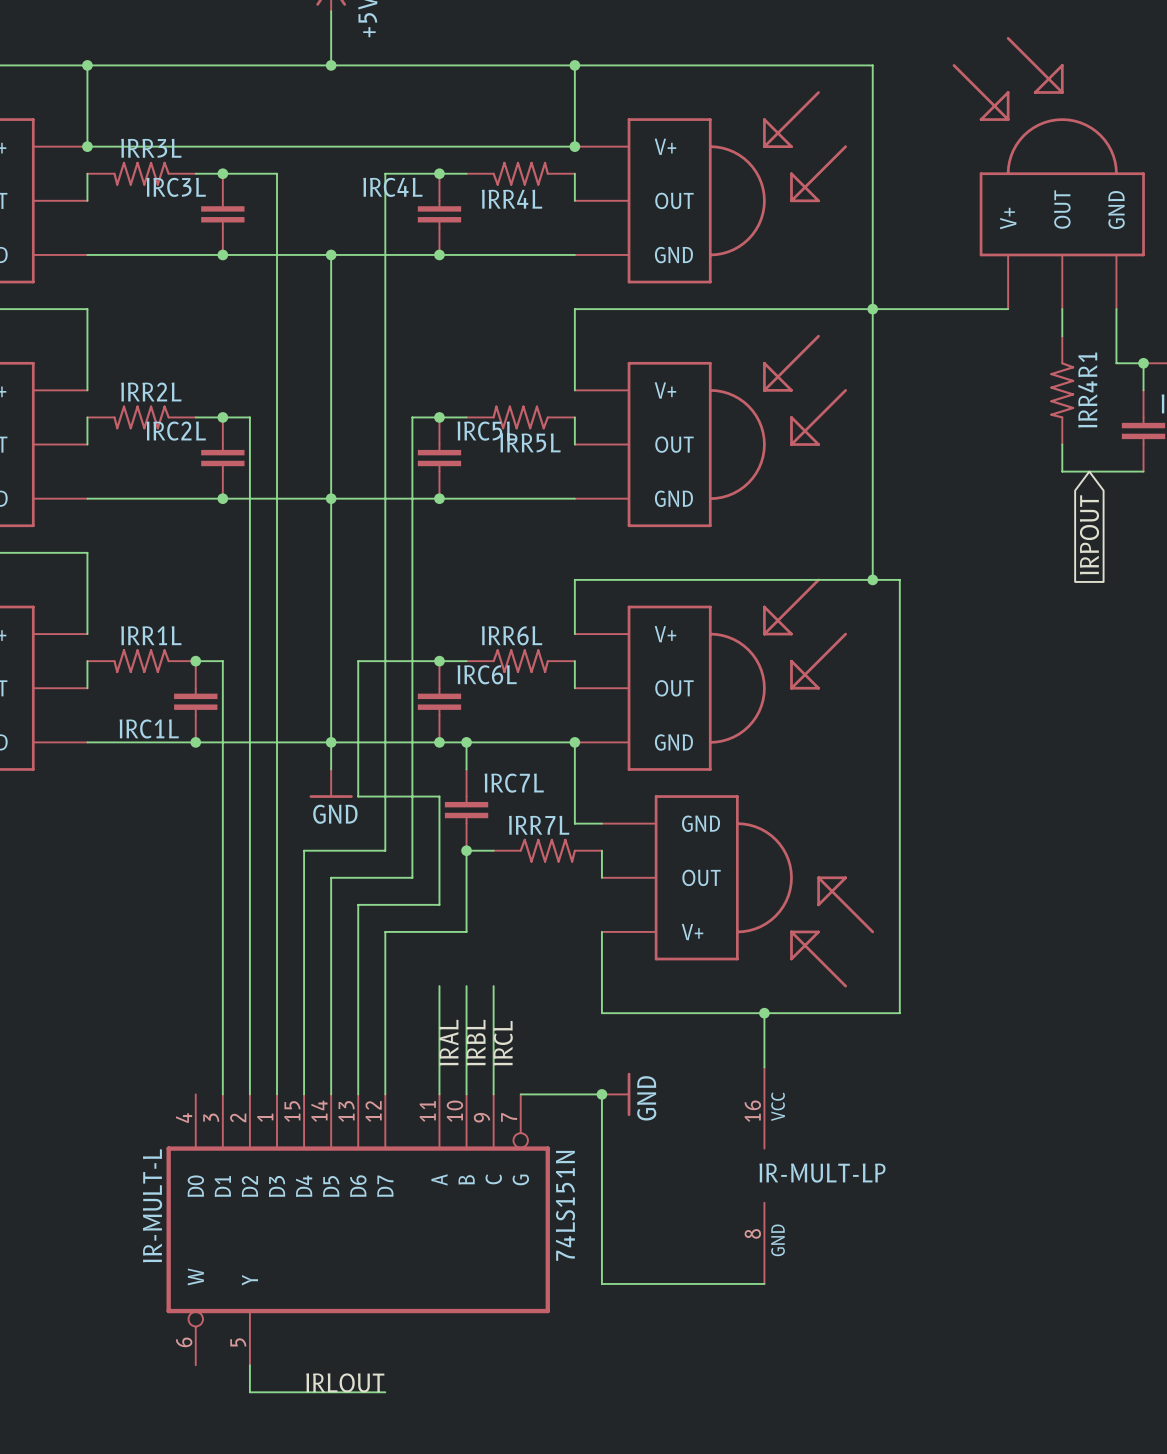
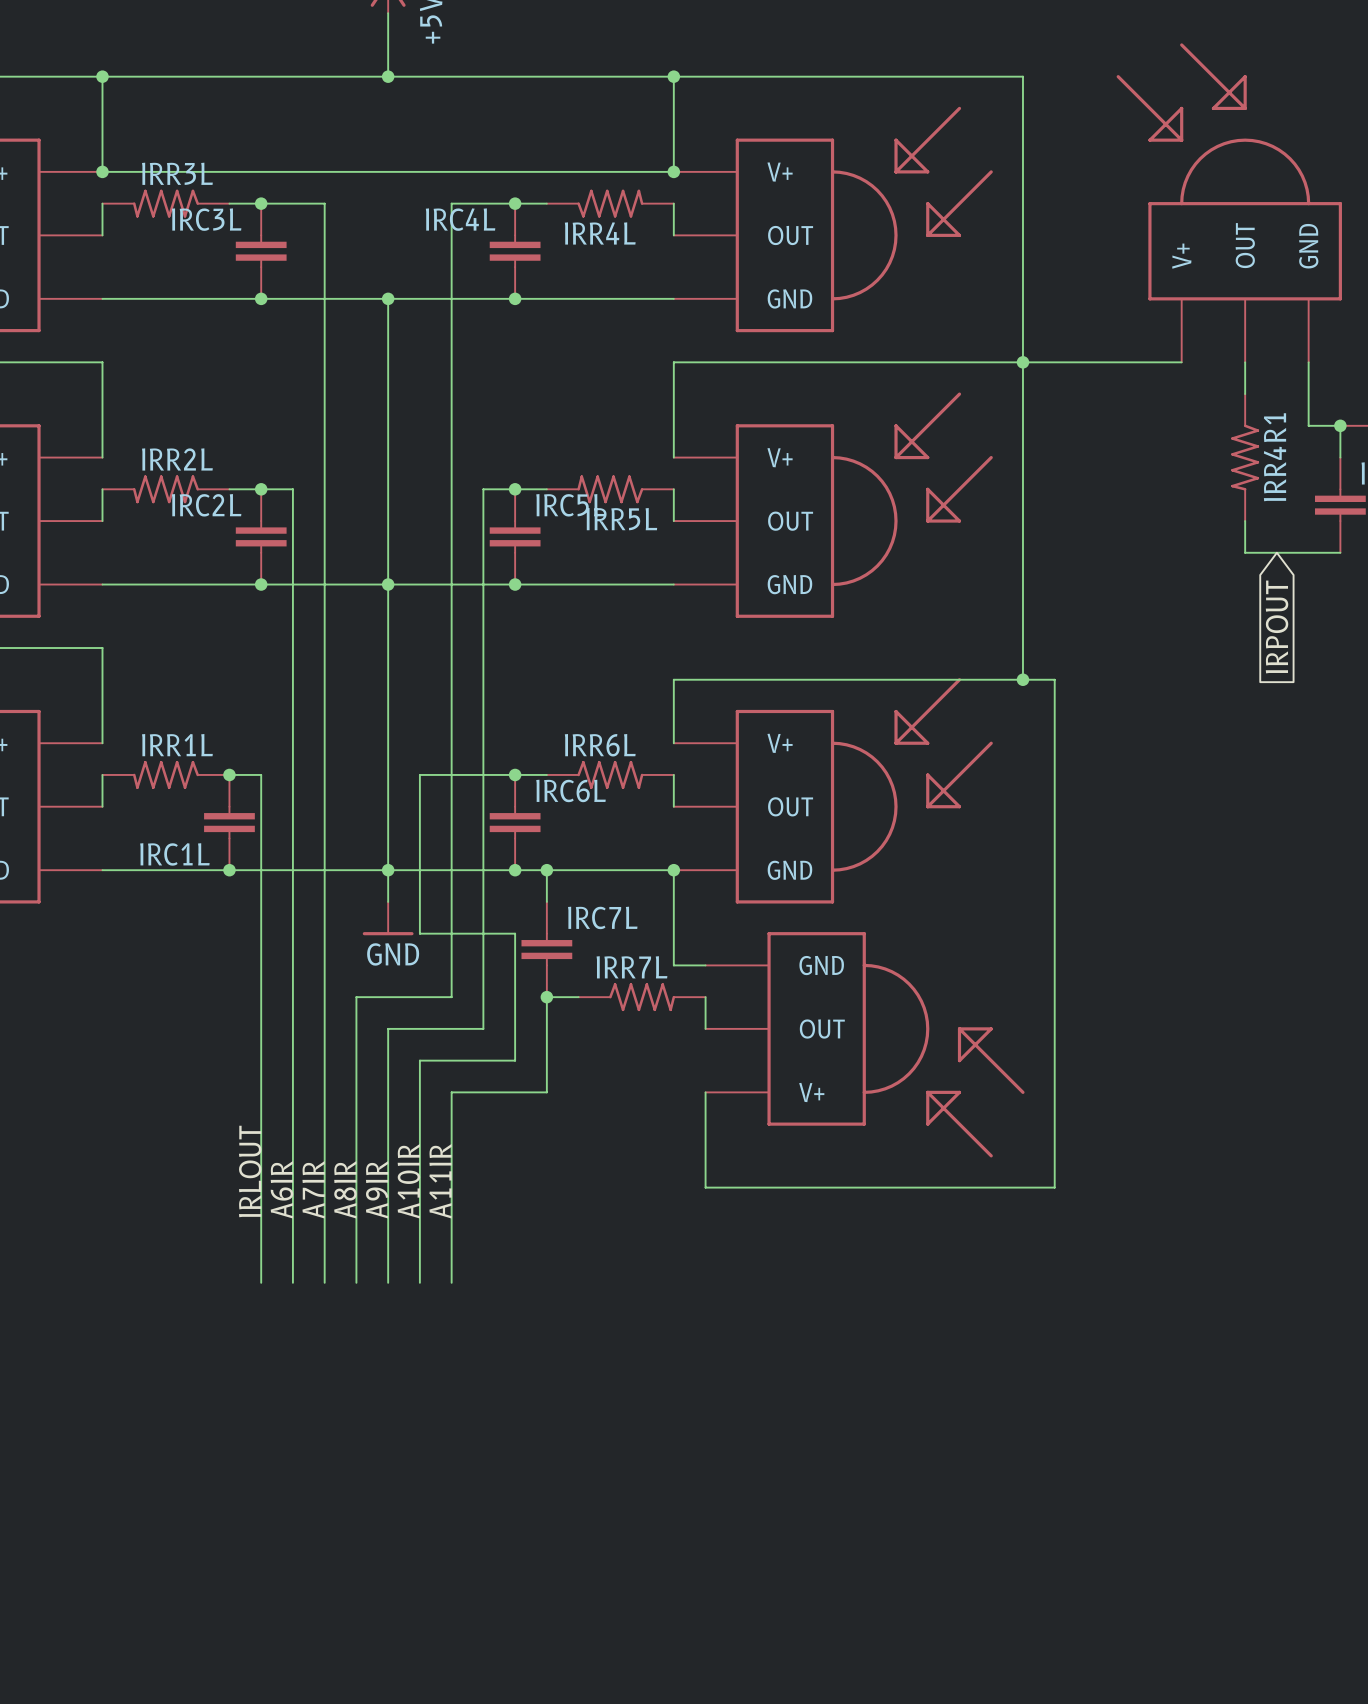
wire: (439, 986) (439, 1094) -> none
wire: (466, 986) (466, 1094) -> none
wire: (493, 986) (493, 1094) -> none
label: none -> IRLOUT (250, 1171)
label: none -> A10IR (408, 1181)
label: none -> A11IR (440, 1181)
wire: (764, 1013) (764, 1067) -> none
junction: (764, 1013) -> none
label: none -> A6IR (281, 1189)
label: none -> A7IR (313, 1189)
label: none -> A8IR (345, 1189)
label: none -> A9IR (377, 1189)
label: IRAL (448, 1042) -> none
label: IRBL (476, 1042) -> none
label: IRCL (503, 1043) -> none
wire: (520, 1094) (601, 1094) (601, 1283) (764, 1283) -> none
junction: (601, 1094) -> none
power symbol: GND (616, 1094) -> none
IR-MULT-LP: (764, 1175) -> none
IR-MULT-L: 74LS151N (358, 1229) -> none
wire: (249, 1365) (249, 1392) (385, 1392) -> none
label: IRLOUT (345, 1382) -> none

